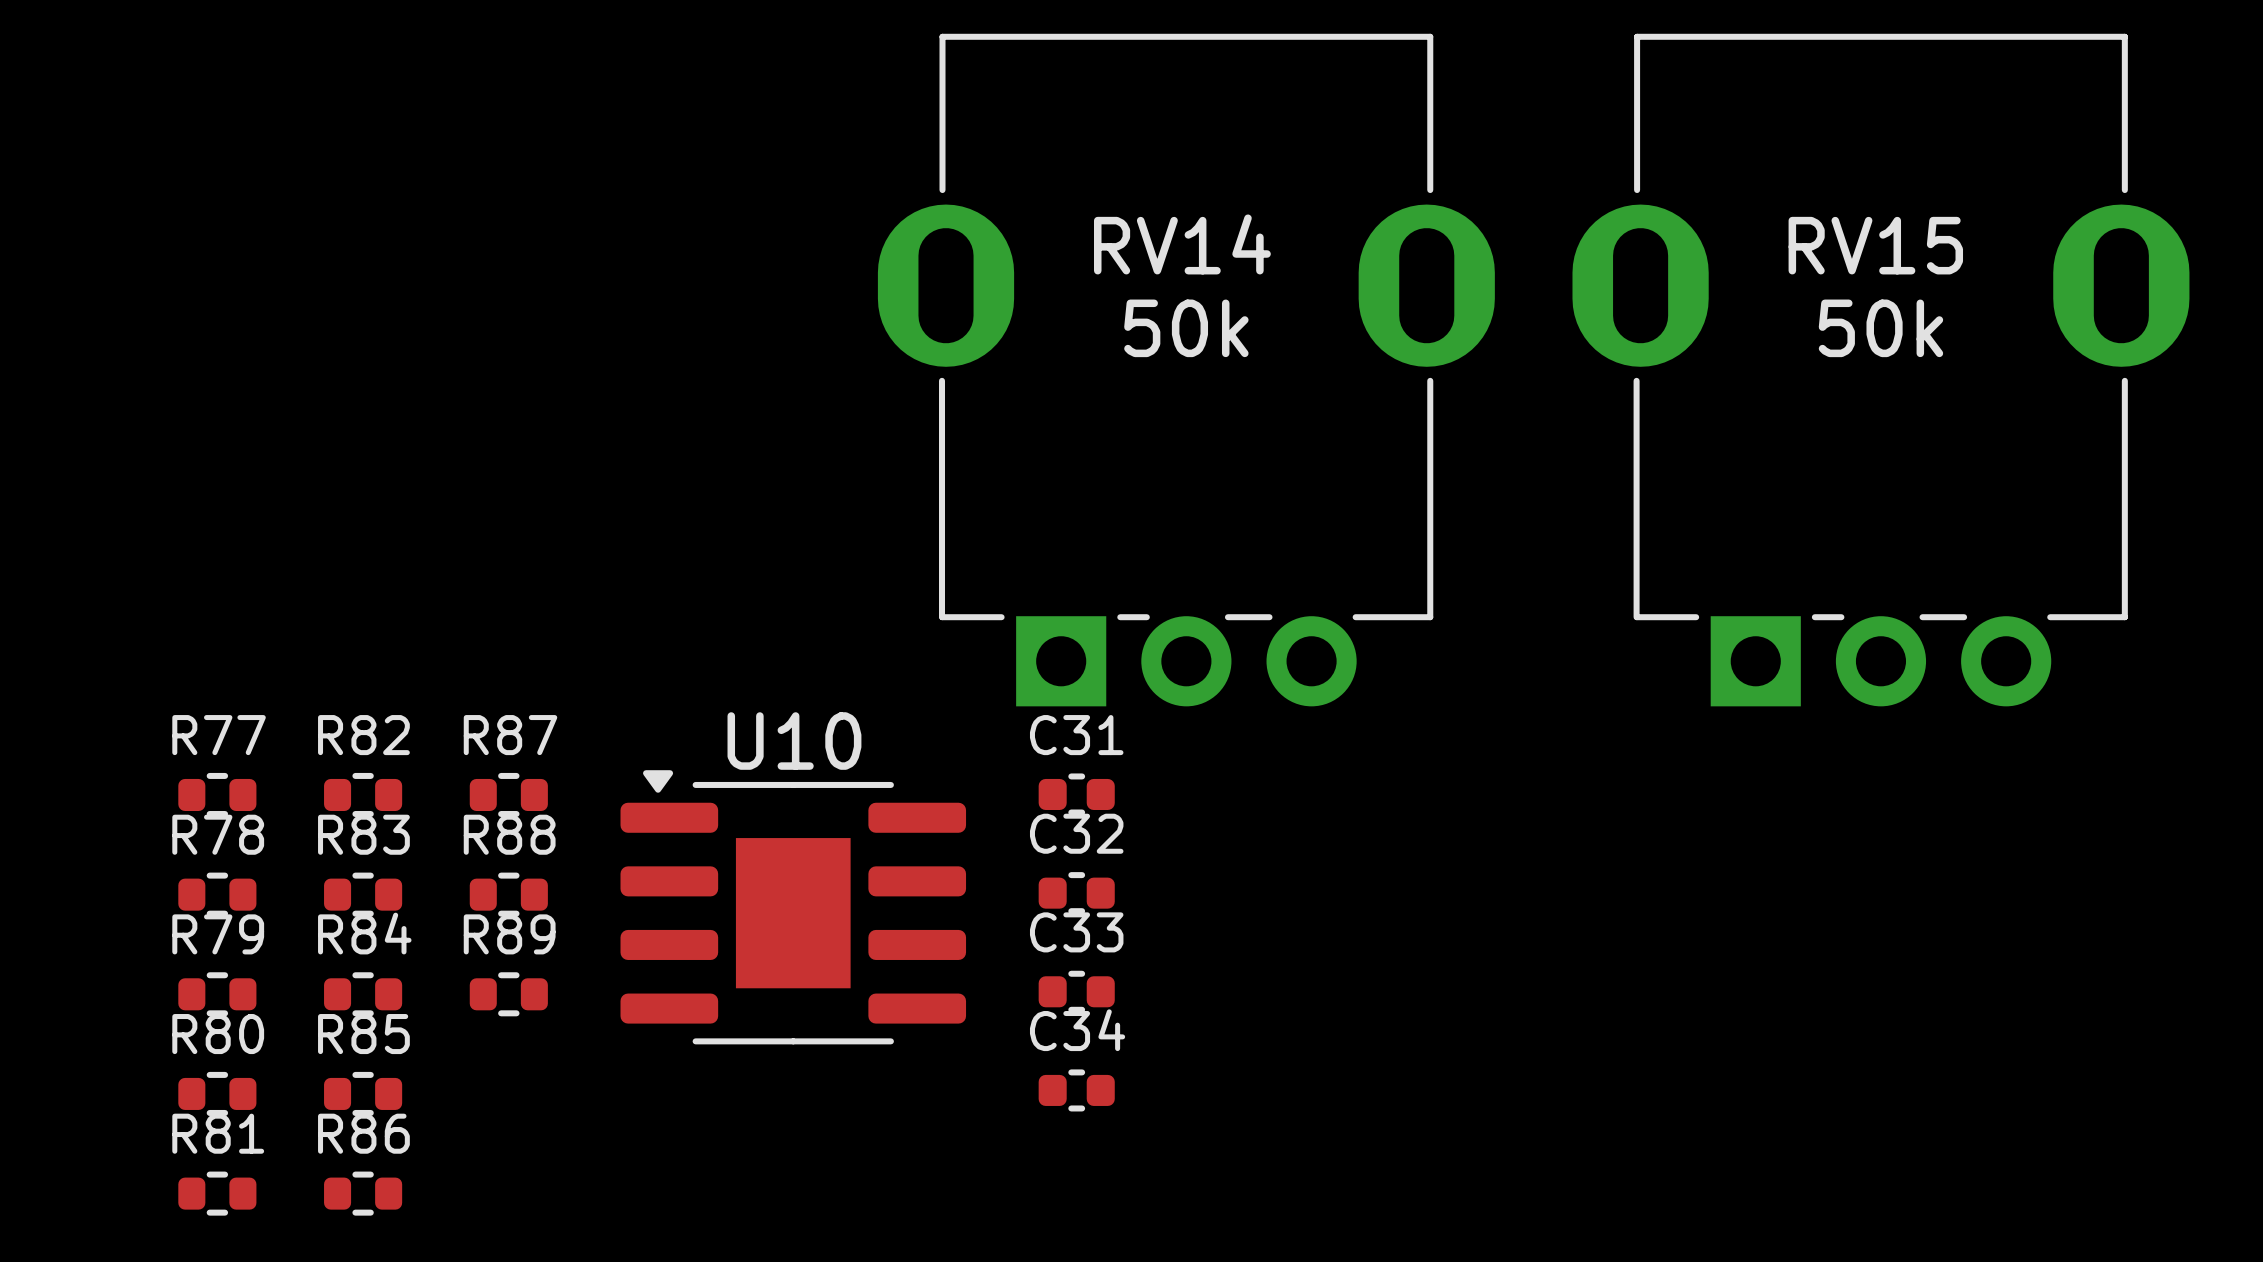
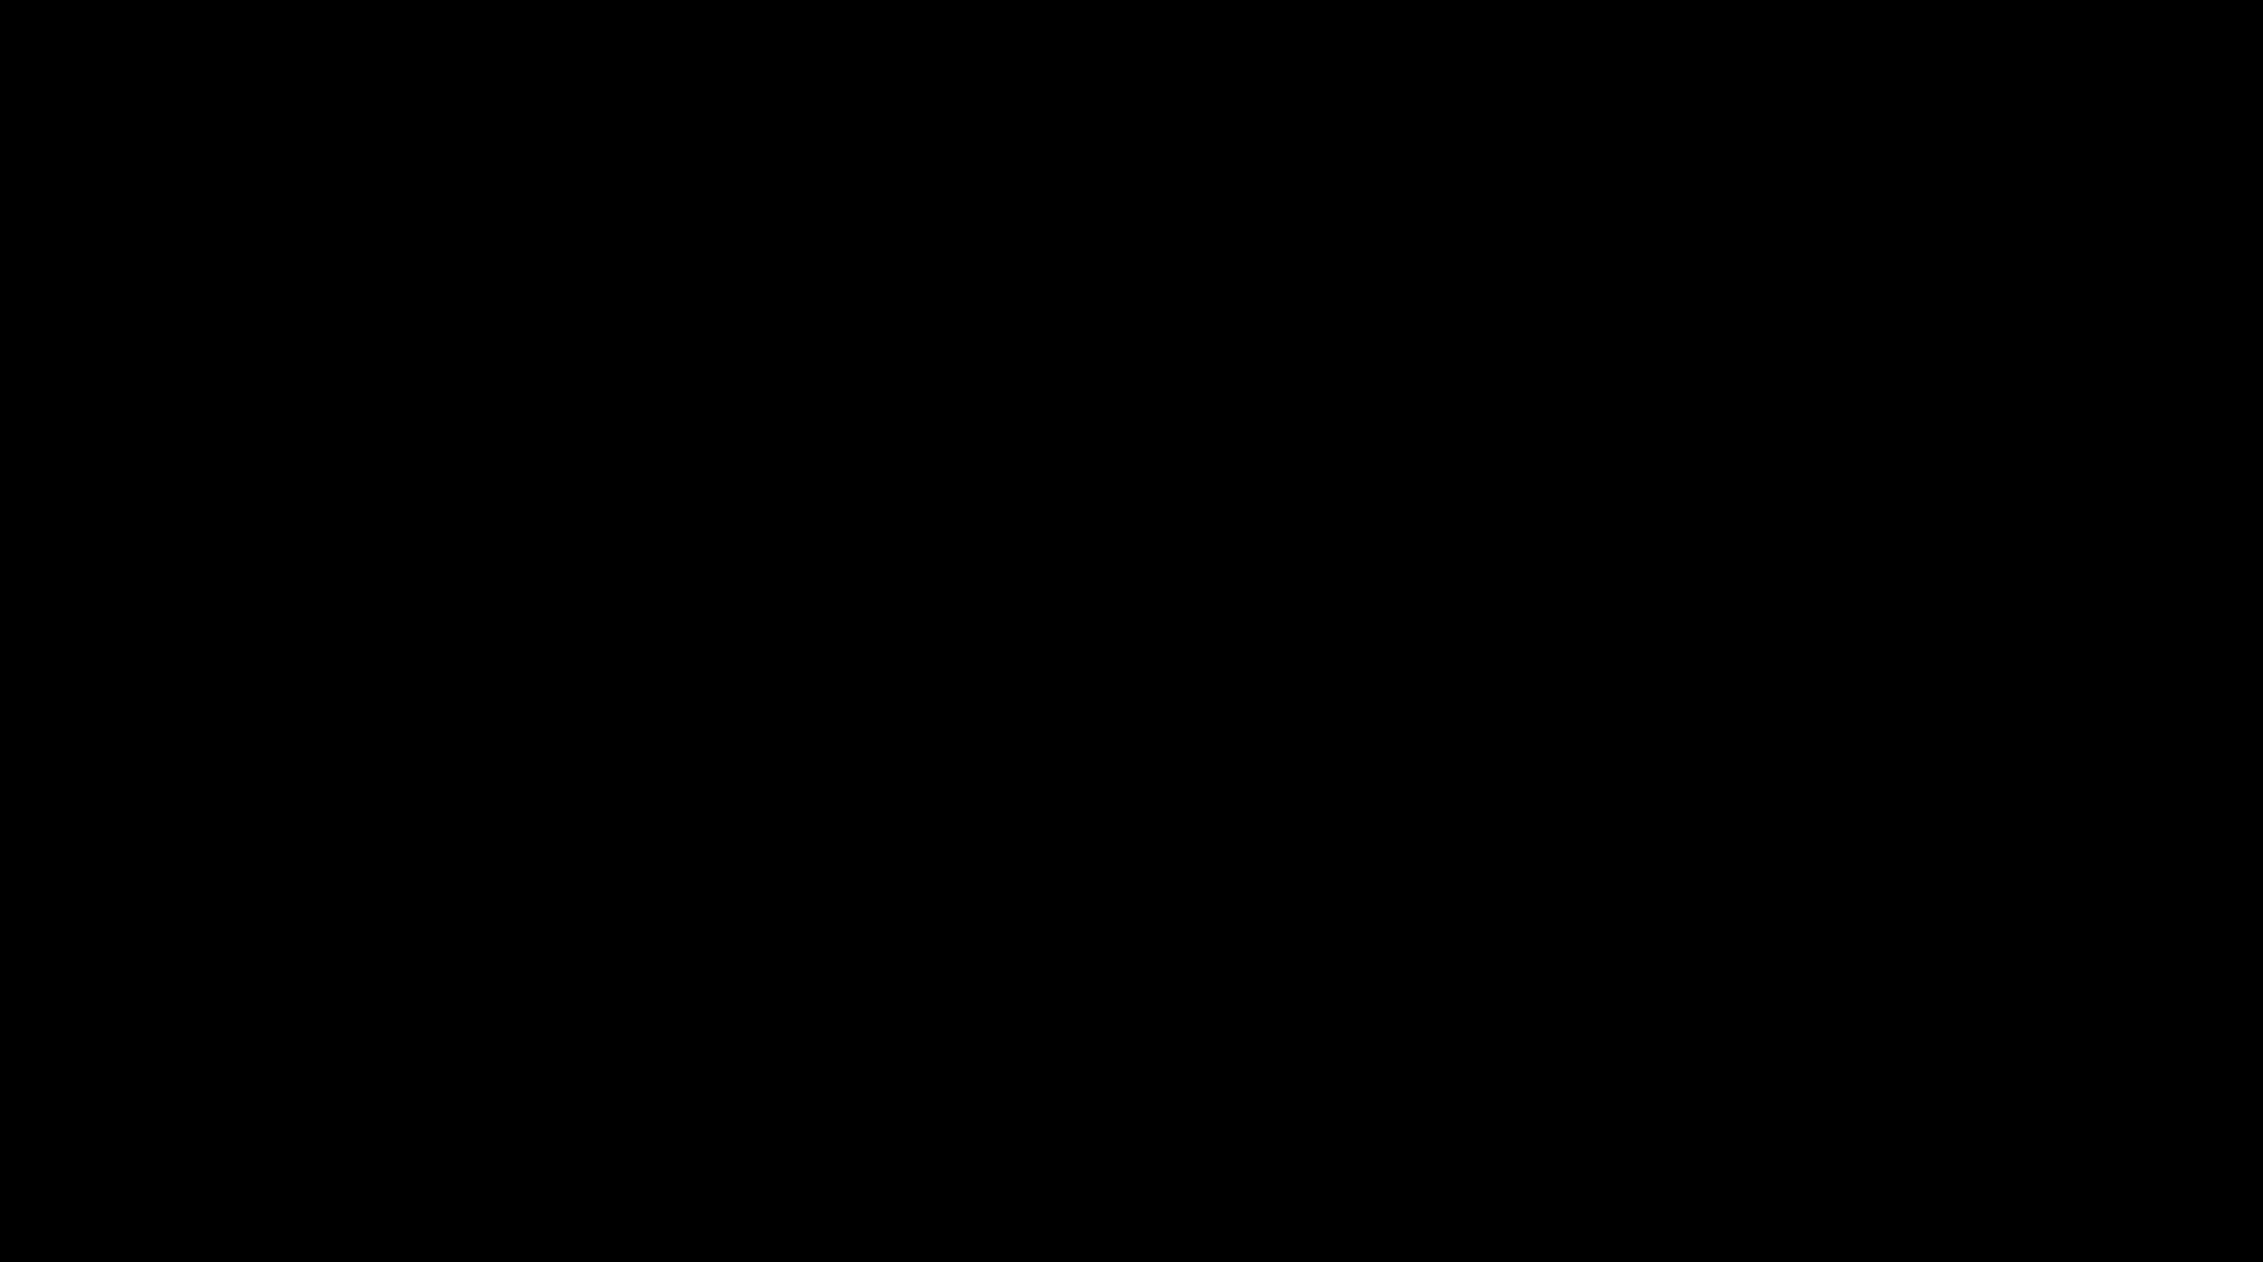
RV14: 50k (1186, 370) -> none
RV15: 50k (1880, 370) -> none
R77: (217, 794) -> none
R82: (363, 794) -> none
R87: (508, 794) -> none
C31: (1076, 794) -> none
C32: (1076, 893) -> none
R78: (217, 894) -> none
R83: (363, 894) -> none
R88: (508, 894) -> none
U10: (793, 907) -> none
C33: (1076, 991) -> none
R79: (217, 994) -> none
R84: (363, 994) -> none
R89: (508, 994) -> none
C34: (1076, 1090) -> none
R80: (217, 1093) -> none
R85: (363, 1093) -> none
R81: (217, 1193) -> none
R86: (363, 1193) -> none

